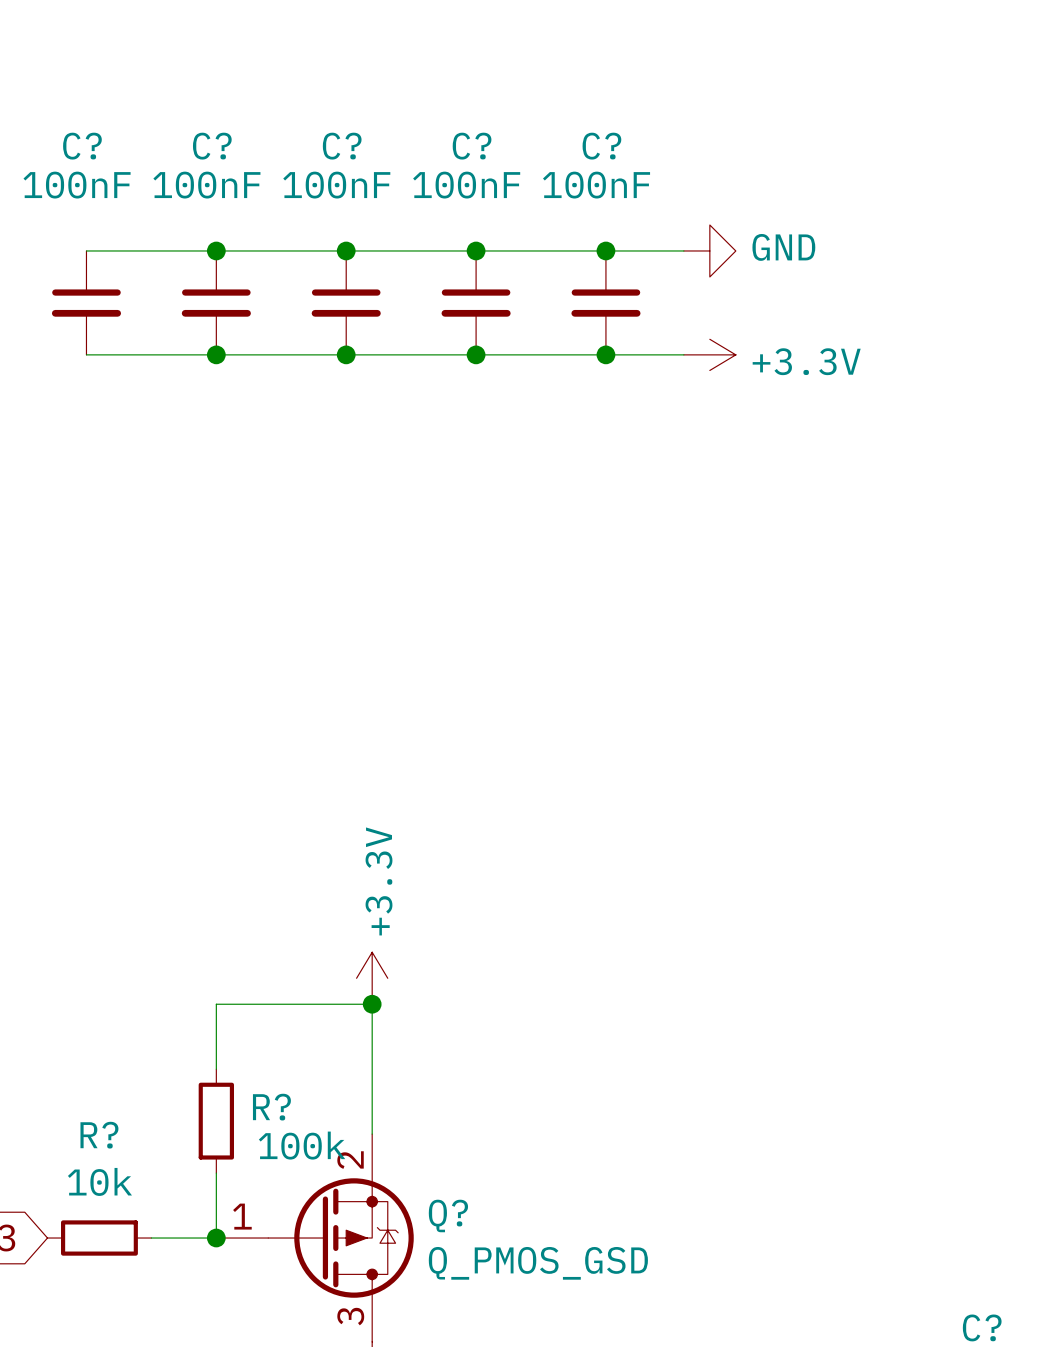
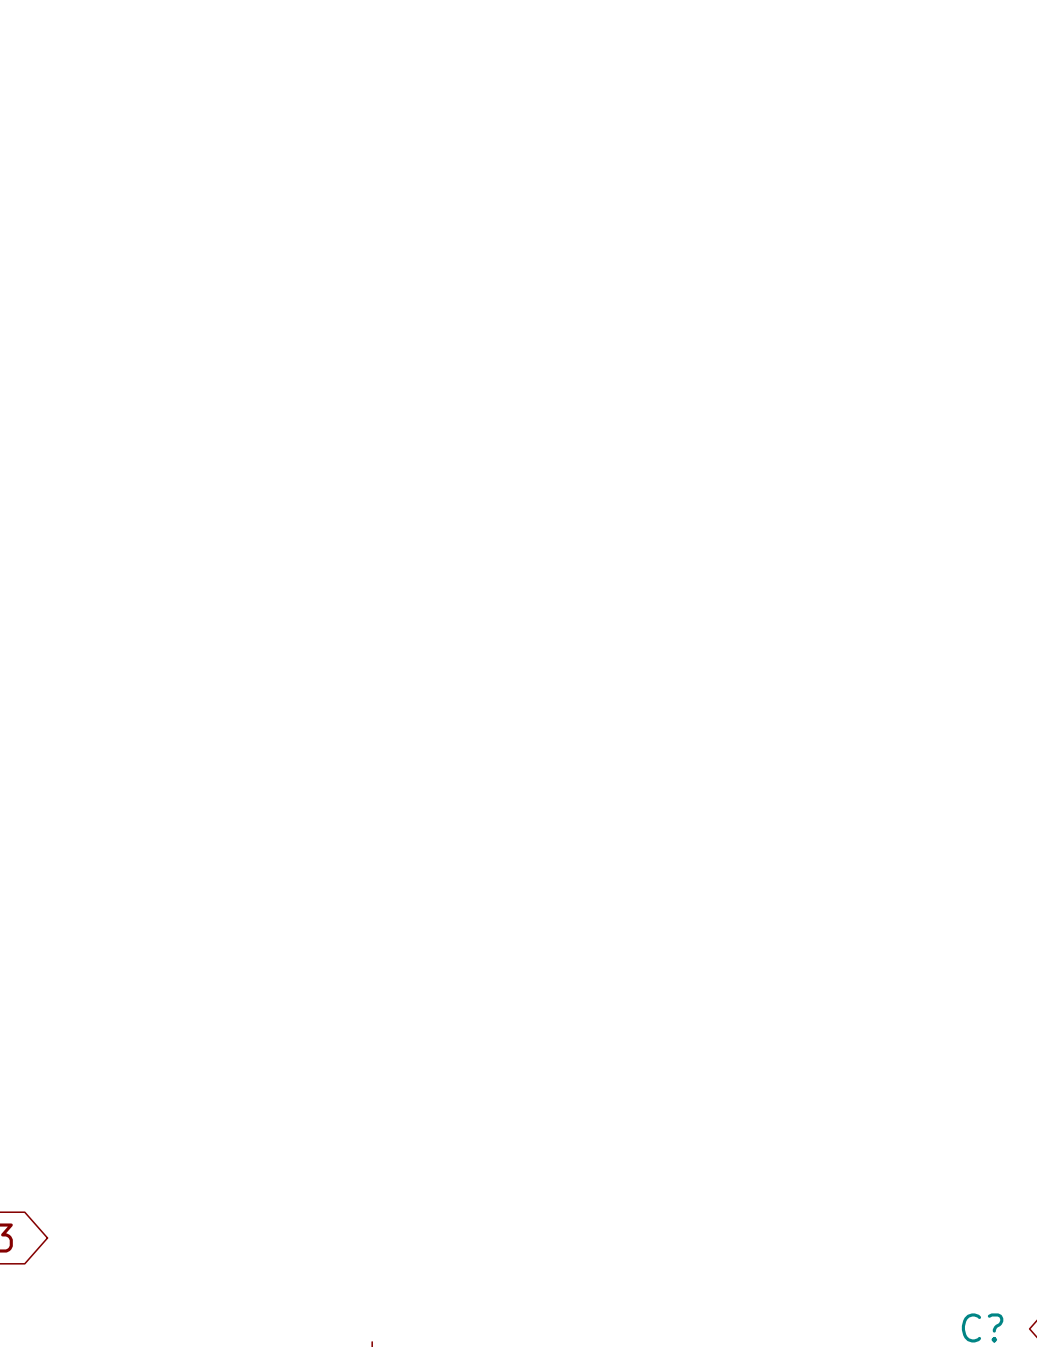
wire: (86, 250) (683, 250) -> none
junction: (216, 250) -> none
junction: (346, 250) -> none
junction: (476, 250) -> none
junction: (605, 250) -> none
power symbol: GND (709, 250) -> none
C?: 100nF (86, 302) -> none
C?: 100nF (216, 302) -> none
C?: 100nF (346, 302) -> none
C?: 100nF (476, 302) -> none
C?: 100nF (605, 302) -> none
wire: (86, 354) (683, 354) -> none
junction: (216, 354) -> none
junction: (346, 354) -> none
junction: (476, 354) -> none
junction: (605, 354) -> none
power symbol: +3.3V (709, 354) -> none
power symbol: +3.3V (372, 978) -> none
junction: (372, 1004) -> none
wire: (216, 1069) (216, 1004) (372, 1004) (372, 1134) -> none
R?: 100k (216, 1121) -> none
wire: (216, 1173) (216, 1238) (151, 1238) -> none
R?: 10k (99, 1238) -> none
junction: (216, 1238) -> none
Q?: Q_PMOS_GSD (315, 1238) -> none

